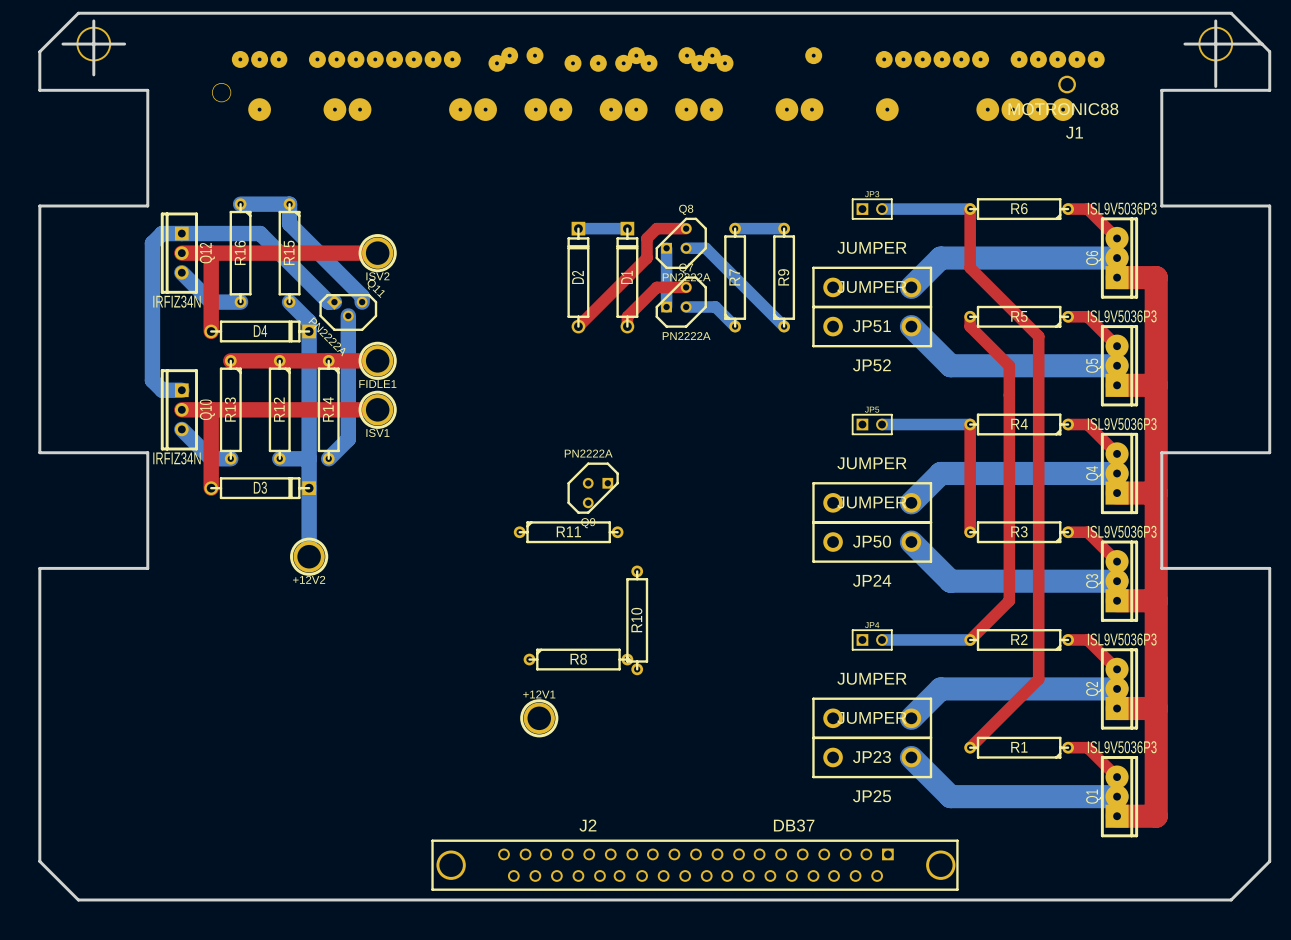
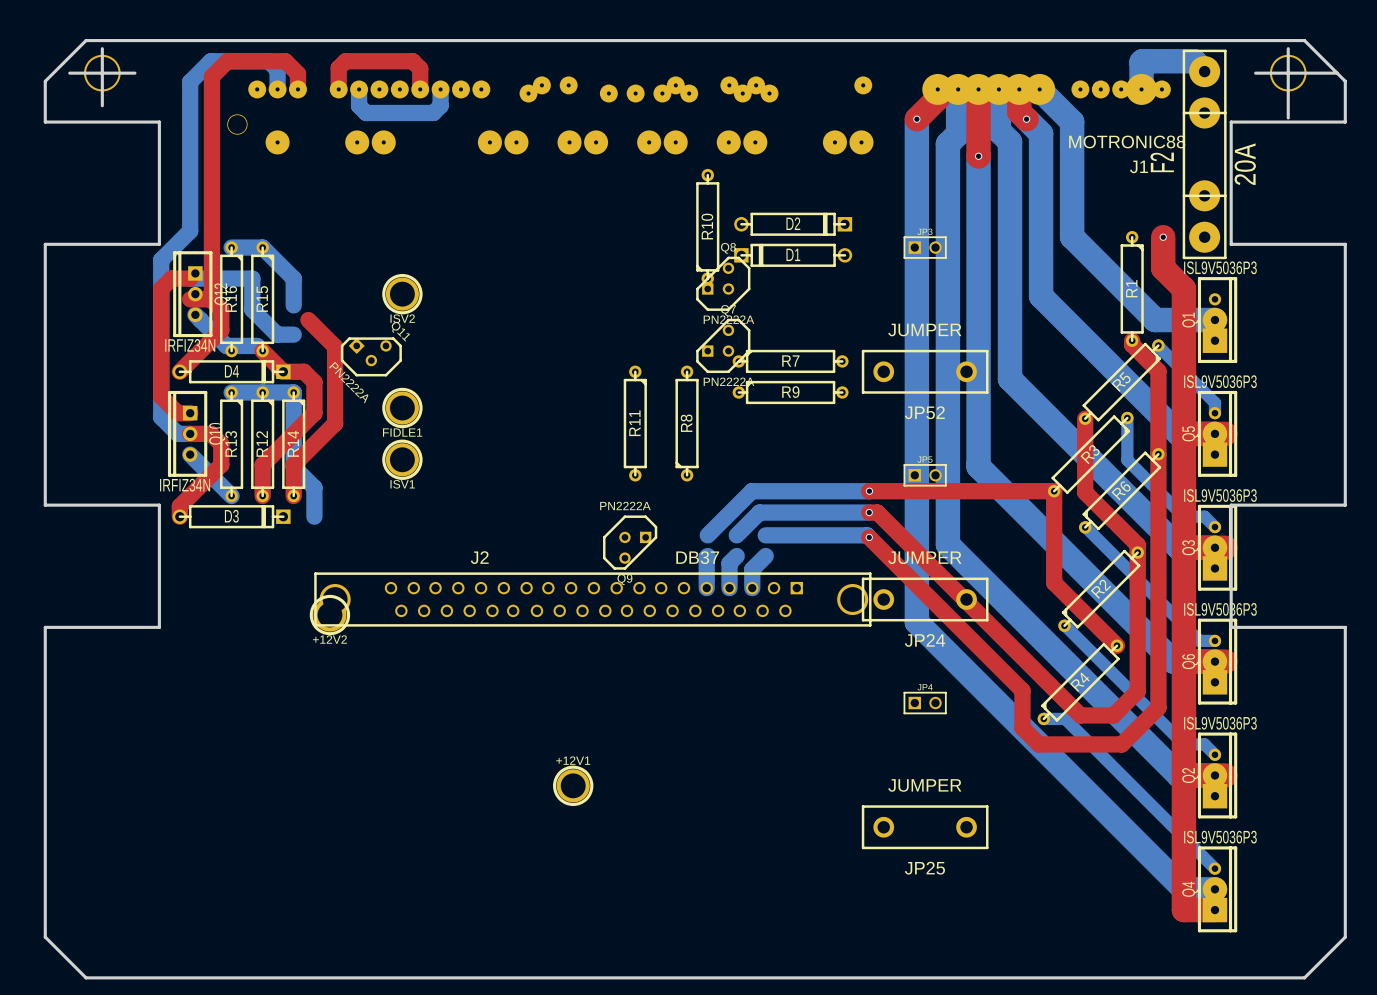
J1 footprint: [76, 26, 1234, 121] -> [84, 54, 1307, 155]
bottom track: none -> (1204, 71) (1194, 61) (1142, 61) (1141, 89)
bottom track: none -> (277, 89) (277, 69) (268, 61) (210, 61) (190, 81) (190, 231) (161, 259) (161, 417) (177, 433) (190, 433)
top track: none -> (297, 89) (297, 73) (285, 61) (227, 61) (211, 76) (211, 300)
top track: none -> (338, 89) (338, 68) (345, 61) (412, 61) (420, 68) (420, 89)
bottom track: none -> (359, 89) (359, 105) (366, 113) (433, 113) (440, 105) (440, 89)
top track: none -> (937, 89) (937, 98) (916, 119)
bottom track: none -> (958, 89) (958, 133) (947, 144) (947, 544) (1178, 775) (1214, 775)
top track: none -> (978, 89) (978, 156)
bottom track: none -> (998, 89) (998, 130) (1010, 141) (1010, 379) (1178, 547) (1214, 547)
top track: none -> (1019, 89) (1019, 111) (1026, 119)
bottom track: none -> (1039, 89) (1072, 121) (1072, 236) (1155, 320) (1214, 320)
bottom track: none -> (916, 119) (916, 622) (1183, 889) (1214, 889)
via: none -> (916, 119)
bottom track: none -> (1026, 119) (1041, 133) (1041, 296) (1178, 433) (1214, 433)
via: none -> (1026, 119)
F2: none -> 20A (1204, 154)
bottom track: none -> (978, 156) (978, 466) (1173, 661) (1214, 661)
via: none -> (978, 156)
top track: none -> (1163, 237) (1163, 268) (1183, 288) (1183, 910) (1214, 910)
via: none -> (1163, 237)
bottom track: (240, 204) (289, 204) (289, 223) (362, 296) (362, 302) -> none
bottom track: none -> (231, 247) (262, 247) (293, 278) (293, 305)
bottom track: (882, 209) (970, 209) -> none
top track: (970, 209) (970, 267) (1038, 336) (1038, 679) (970, 747) -> none
R6 rotation: 0° (1019, 209) -> 135° clockwise (1121, 490)
R6 position: (1019, 209) -> (1121, 490)
top track: (1068, 209) (1087, 209) (1117, 238) -> none
Q6 footprint: [1100, 217, 1139, 299] -> [1197, 618, 1238, 705]
bottom track: (578, 228) (627, 228) -> none
top track: (686, 228) (656, 228) (646, 238) (646, 258) (578, 326) -> none
bottom track: (735, 228) (784, 228) -> none
top track: none -> (190, 278) (171, 278) (161, 288) (161, 396) (177, 413) (190, 413)
bottom track: none -> (190, 278) (252, 278) (252, 309) (277, 334) (293, 334)
bottom track: (666, 248) (666, 307) -> none
bottom track: (686, 248) (705, 248) (784, 326) -> none
top track: (181, 253) (377, 253) -> none
top track: (211, 253) (211, 331) -> none
R16 position: (240, 253) -> (231, 299)
R15 position: (289, 253) -> (262, 299)
top track: none -> (190, 299) (210, 299) (221, 309) (221, 330) (179, 371)
bottom track: (1117, 258) (940, 258) (911, 287) -> none
top track: none -> (308, 320) (335, 346) (335, 423) (293, 464) (293, 496)
D2 rotation: 0° (578, 277) -> 90° clockwise (793, 224)
D2 position: (578, 277) -> (793, 224)
D1 rotation: 0° (627, 277) -> 90° counterclockwise (793, 255)
D1 position: (627, 277) -> (793, 255)
R7 rotation: 0° (735, 277) -> 90° clockwise (790, 361)
R9 rotation: 0° (784, 277) -> 90° clockwise (790, 392)
R9 position: (784, 277) -> (790, 392)
top track: (1117, 277) (1156, 277) (1156, 816) (1117, 816) -> none
top track: (686, 287) (656, 287) (627, 316) (627, 326) -> none
JP51: JUMPER (872, 287) -> none
top track: none -> (1132, 340) (1132, 344) (1158, 371) (1158, 707) (1121, 744) (1039, 744) (1022, 727) (1022, 690) (869, 537)
bottom track: none -> (1158, 345) (1214, 402) (1214, 413)
bottom track: (289, 302) (309, 321) (309, 556) -> none
bottom track: (334, 302) (328, 302) (260, 233) (162, 233) (152, 243) (152, 380) (162, 390) (181, 390) -> none
top track: none -> (262, 351) (283, 371) (304, 371) (314, 382) (314, 413) (262, 464) (262, 496)
bottom track: (686, 307) (715, 307) (735, 326) -> none
bottom track: (348, 315) (348, 439) (328, 458) -> none
top track: (970, 316) (970, 326) (1009, 365) (1009, 600) (970, 639) -> none
R5 rotation: 0° (1019, 316) -> 45° counterclockwise (1121, 382)
top track: (1068, 316) (1087, 316) (1117, 346) -> none
Q5 footprint: [1100, 325, 1139, 407] -> [1197, 390, 1238, 477]
bottom track: (911, 326) (950, 365) (1117, 365) -> none
D4 position: (260, 331) -> (231, 371)
bottom track: none -> (231, 392) (293, 392) (293, 467) (314, 487) (314, 516)
top track: (230, 360) (377, 360) -> none
bottom track: none -> (1127, 417) (1127, 460) (1183, 516) (1204, 516) (1214, 527)
top track: none -> (1085, 418) (1085, 492) (1137, 545) (1137, 691) (1113, 715) (1080, 715) (877, 512) (869, 512)
top track: none -> (190, 433) (210, 433) (221, 444) (221, 464) (179, 506) (179, 516)
bottom track: none -> (190, 454) (231, 496)
Q10 position: (179, 409) -> (187, 433)
top track: (181, 409) (377, 409) -> none
top track: (211, 409) (211, 488) -> none
R13 position: (230, 409) -> (231, 444)
R12 position: (279, 409) -> (262, 444)
R14 position: (328, 409) -> (293, 444)
bottom track: (882, 424) (970, 424) -> none
top track: (970, 424) (970, 532) -> none
R4 rotation: 0° (1019, 424) -> 135° clockwise (1080, 682)
R4 position: (1019, 424) -> (1080, 682)
top track: (1068, 424) (1087, 424) (1117, 453) -> none
bottom track: (181, 429) (211, 458) (230, 458) -> none
Q4 footprint: [1100, 432, 1139, 515] -> [1197, 846, 1238, 933]
top track: none -> (869, 491) (1054, 491) (1054, 582) (1117, 645)
bottom track: none -> (869, 491) (751, 491) (707, 535)
via: none -> (869, 491)
bottom track: (279, 458) (309, 458) -> none
bottom track: none -> (869, 512) (759, 512) (736, 535)
via: none -> (869, 512)
bottom track: none -> (1085, 527) (1199, 640) (1214, 640)
bottom track: (1117, 473) (940, 473) (911, 502) -> none
bottom track: none -> (765, 535) (867, 535) (869, 537)
via: none -> (869, 537)
D3 position: (260, 488) -> (231, 516)
bottom track: none -> (707, 556) (706, 588)
bottom track: none -> (736, 556) (729, 563) (729, 588)
bottom track: none -> (765, 556) (752, 569) (752, 588)
JP50: JUMPER (872, 502) -> none
R11 rotation: 0° (568, 532) -> 90° clockwise (635, 423)
R11 position: (568, 532) -> (635, 423)
R3 rotation: 0° (1019, 532) -> 45° counterclockwise (1090, 454)
R3 position: (1019, 532) -> (1090, 454)
top track: (1068, 532) (1087, 532) (1117, 561) -> none
Q3 footprint: [1100, 540, 1139, 622] -> [1197, 504, 1238, 591]
bottom track: (911, 542) (950, 581) (1117, 581) -> none
bottom track: none -> (1064, 625) (1183, 744) (1204, 744) (1214, 754)
R10 position: (637, 620) -> (707, 226)
bottom track: (882, 639) (970, 639) -> none
R2 rotation: 0° (1019, 639) -> 135° clockwise (1101, 589)
R2 position: (1019, 639) -> (1101, 589)
top track: (1068, 639) (1087, 639) (1117, 669) -> none
Q2 footprint: [1100, 648, 1139, 730] -> [1197, 732, 1238, 819]
bottom track: none -> (1043, 718) (1065, 718) (1214, 868)
R8 rotation: 0° (578, 659) -> 90° counterclockwise (687, 423)
R8 position: (578, 659) -> (687, 423)
bottom track: (1117, 688) (940, 688) (911, 718) -> none
JP23: JUMPER (872, 718) -> none
R1 rotation: 0° (1019, 747) -> 90° counterclockwise (1132, 288)
R1 position: (1019, 747) -> (1132, 288)
top track: (1068, 747) (1087, 747) (1117, 777) -> none
Q1 footprint: [1100, 756, 1139, 838] -> [1197, 277, 1238, 363]
bottom track: (911, 757) (950, 796) (1117, 796) -> none
J2 position: (694, 865) -> (592, 599)

